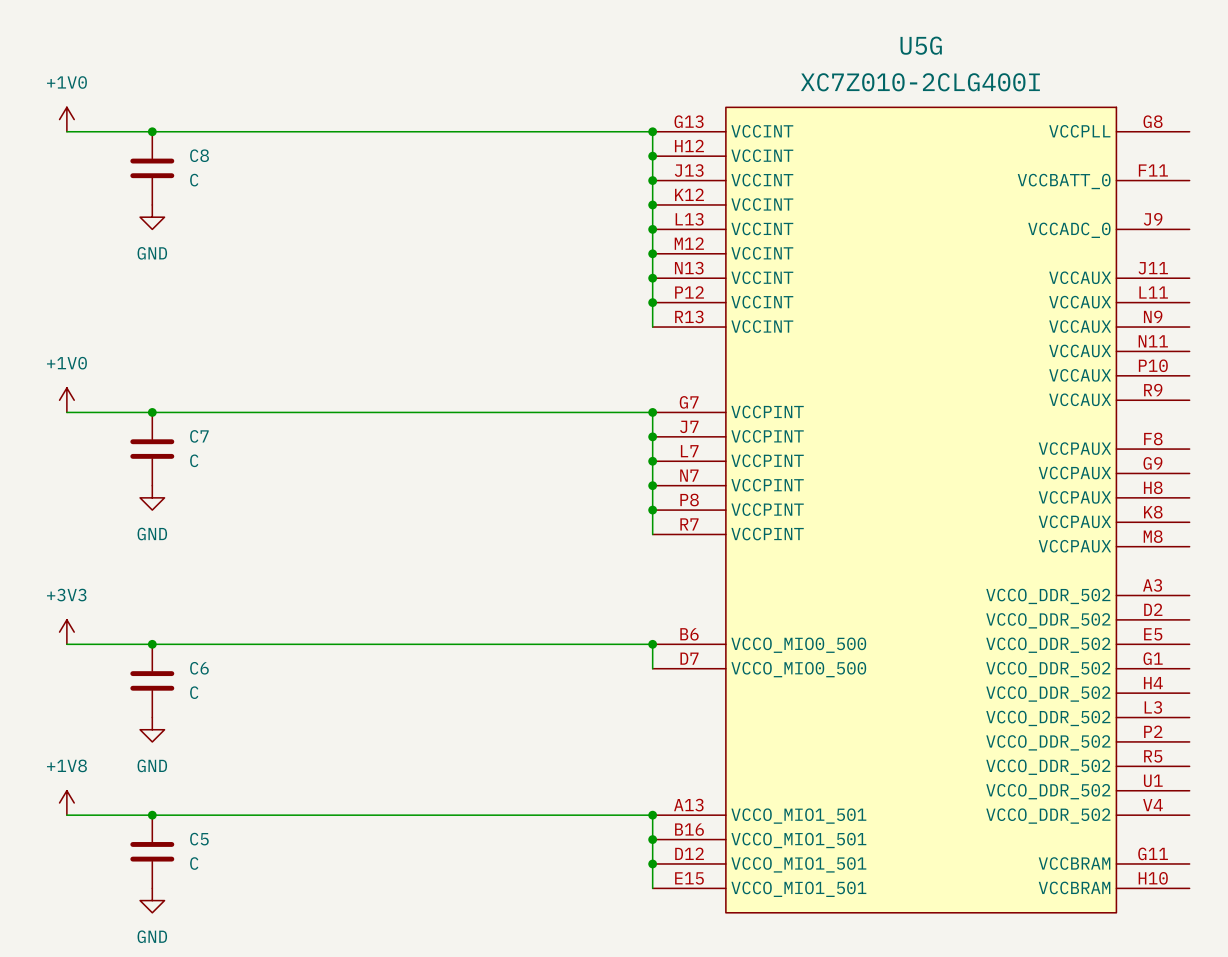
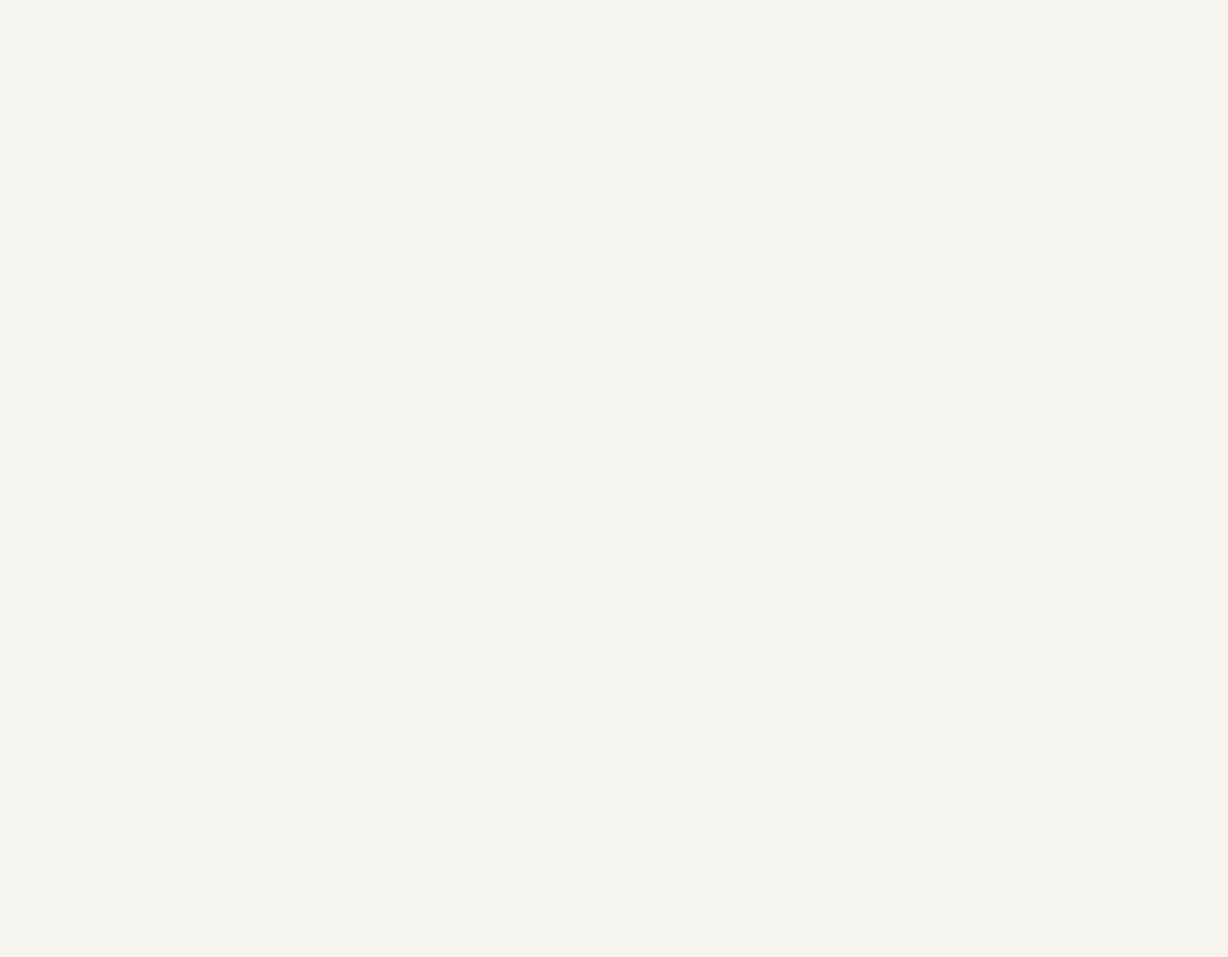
power symbol: +1V0 (66, 119) -> none
wire: (66, 131) (652, 131) (652, 327) -> none
junction: (152, 131) -> none
junction: (652, 131) -> none
junction: (652, 156) -> none
C8: C (152, 168) -> none
junction: (652, 180) -> none
junction: (652, 204) -> none
power symbol: GND (152, 217) -> none
junction: (652, 229) -> none
junction: (652, 253) -> none
junction: (652, 278) -> none
junction: (652, 302) -> none
power symbol: +1V0 (66, 400) -> none
wire: (66, 412) (652, 412) (652, 534) -> none
junction: (152, 412) -> none
junction: (652, 412) -> none
junction: (652, 436) -> none
C7: C (152, 449) -> none
junction: (652, 461) -> none
junction: (652, 485) -> none
power symbol: GND (152, 497) -> none
junction: (652, 510) -> none
U5G: XC7Z010-2CLG400I (921, 510) -> none
power symbol: +3V3 (66, 632) -> none
wire: (66, 644) (652, 644) (652, 668) -> none
junction: (152, 644) -> none
junction: (652, 644) -> none
C6: C (152, 680) -> none
power symbol: GND (152, 729) -> none
power symbol: +1V8 (66, 802) -> none
wire: (66, 815) (652, 815) (652, 888) -> none
junction: (152, 815) -> none
junction: (652, 815) -> none
junction: (652, 839) -> none
C5: C (152, 851) -> none
junction: (652, 863) -> none
power symbol: GND (152, 900) -> none

